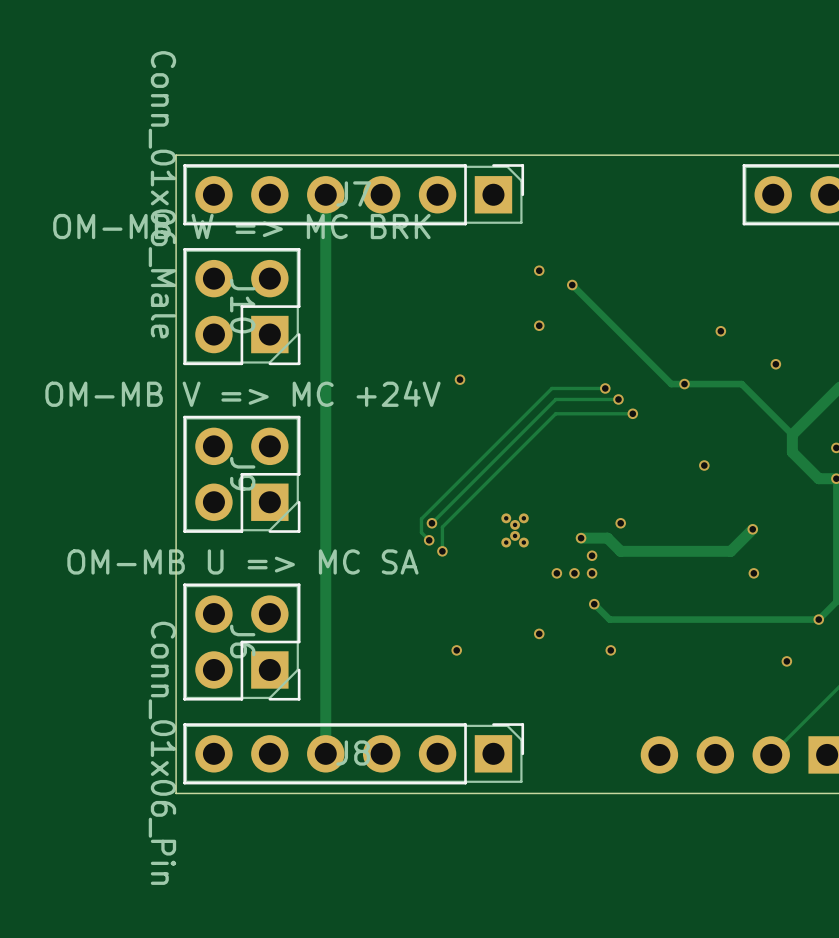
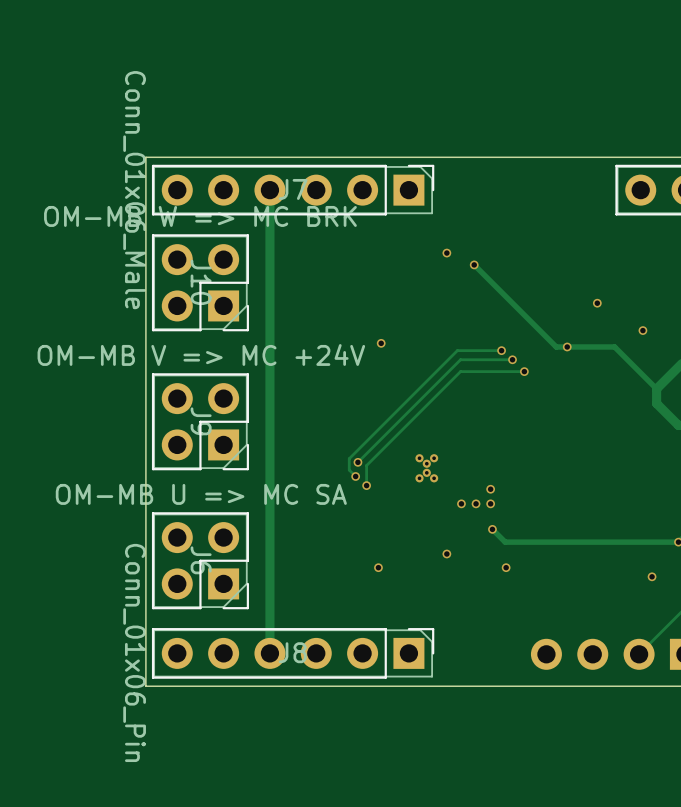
via: (539, 325) -> none
via: (704, 465) -> none
via: (620, 523) -> none
track: (752, 529) (730, 551) (620, 551) (607, 538) (581, 538) -> none
via: (752, 529) -> none
via: (581, 538) -> none
via: (753, 573) -> none

